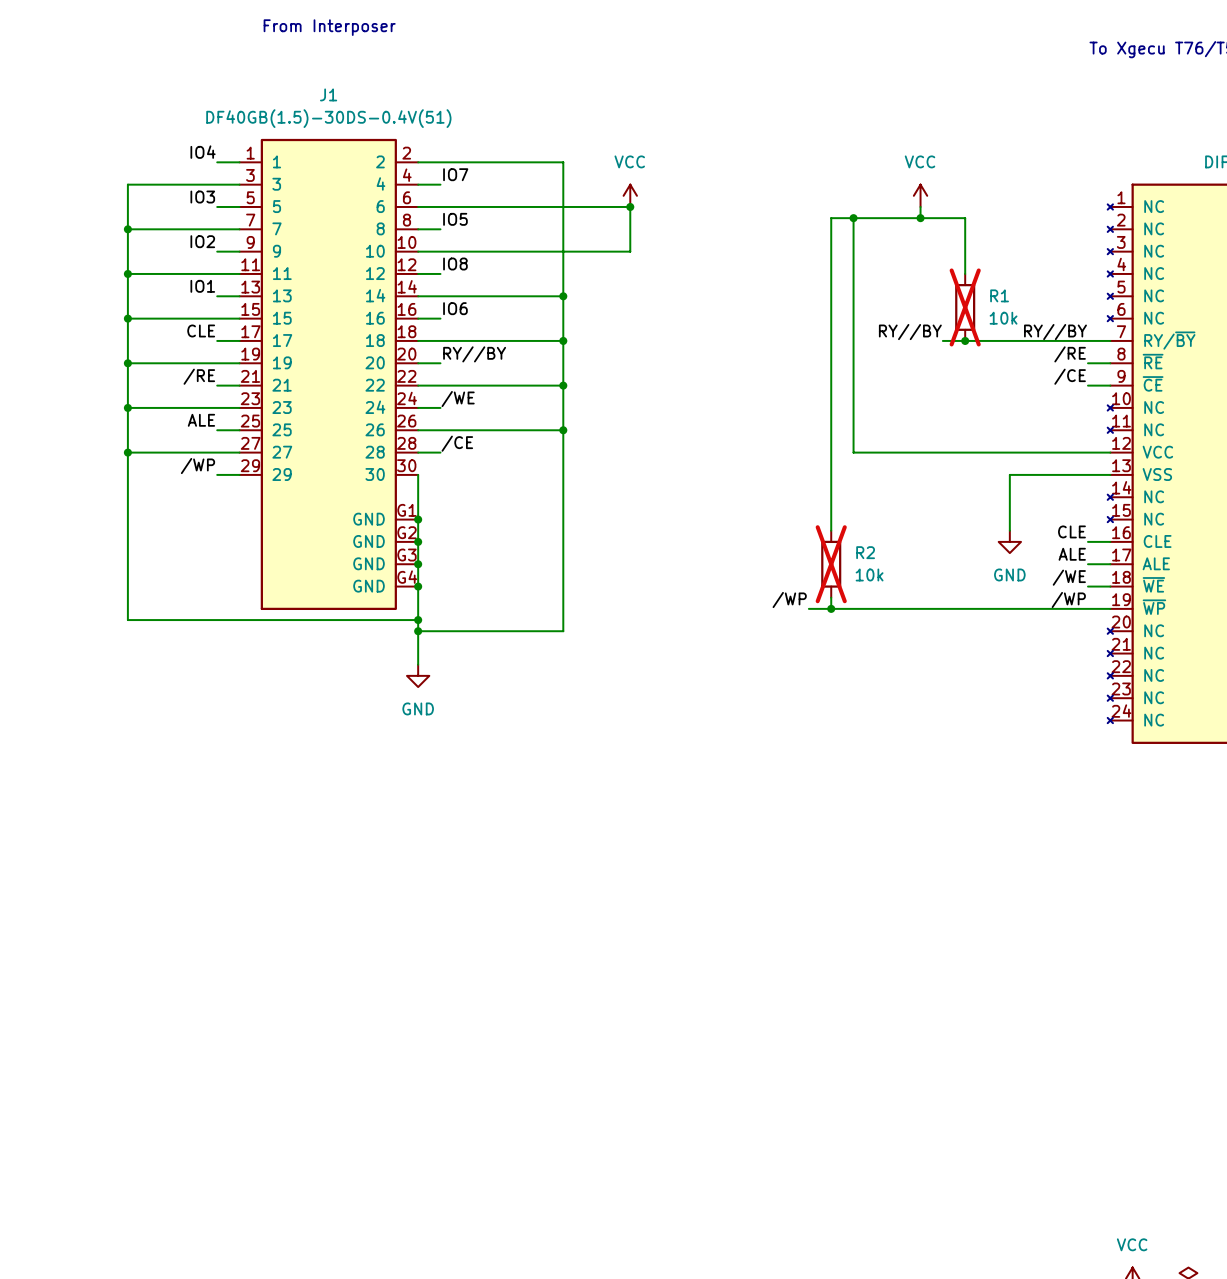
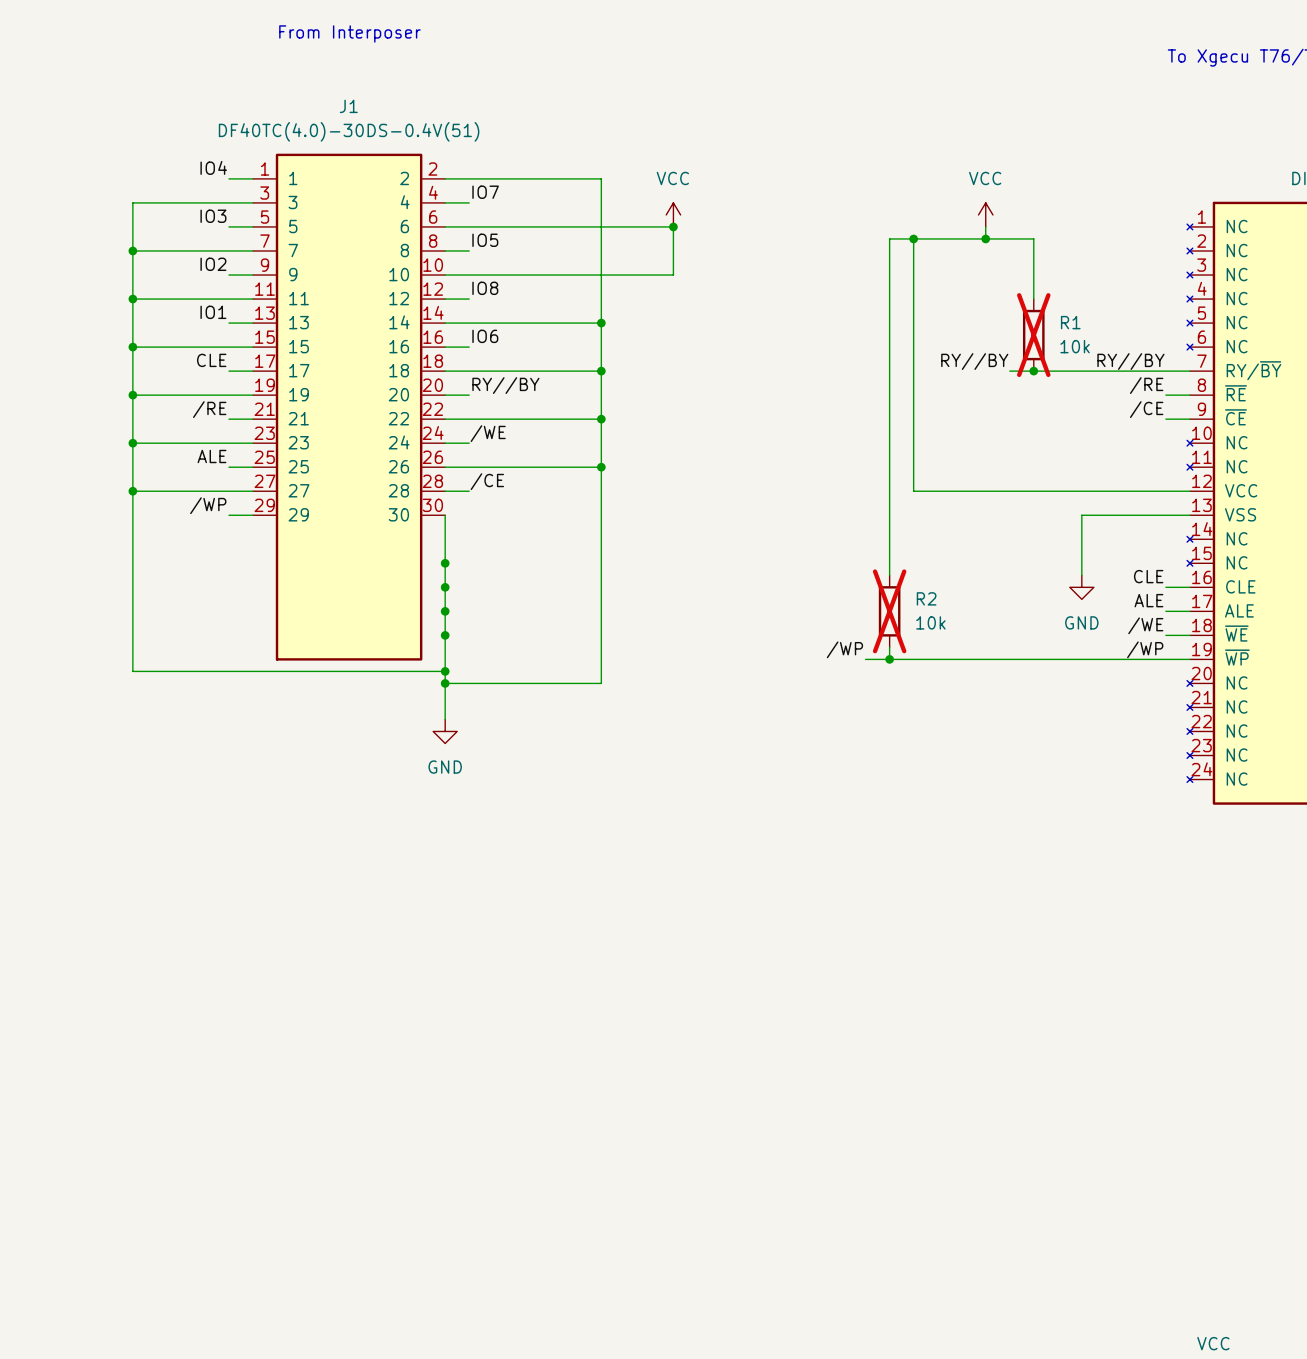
J1 value: DF40GB(1.5)-30DS-0.4V(51) (328, 118) -> DF40TC(4.0)-30DS-0.4V(51) (349, 131)
J1 symbol: [239, 138, 419, 611] -> [252, 153, 446, 661]

